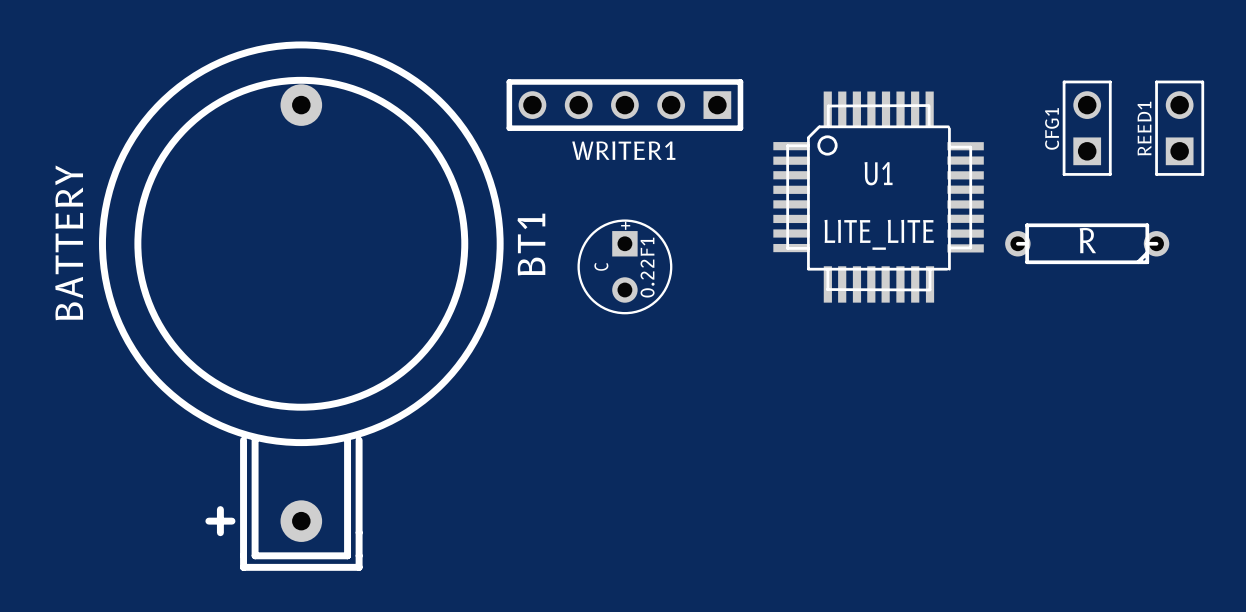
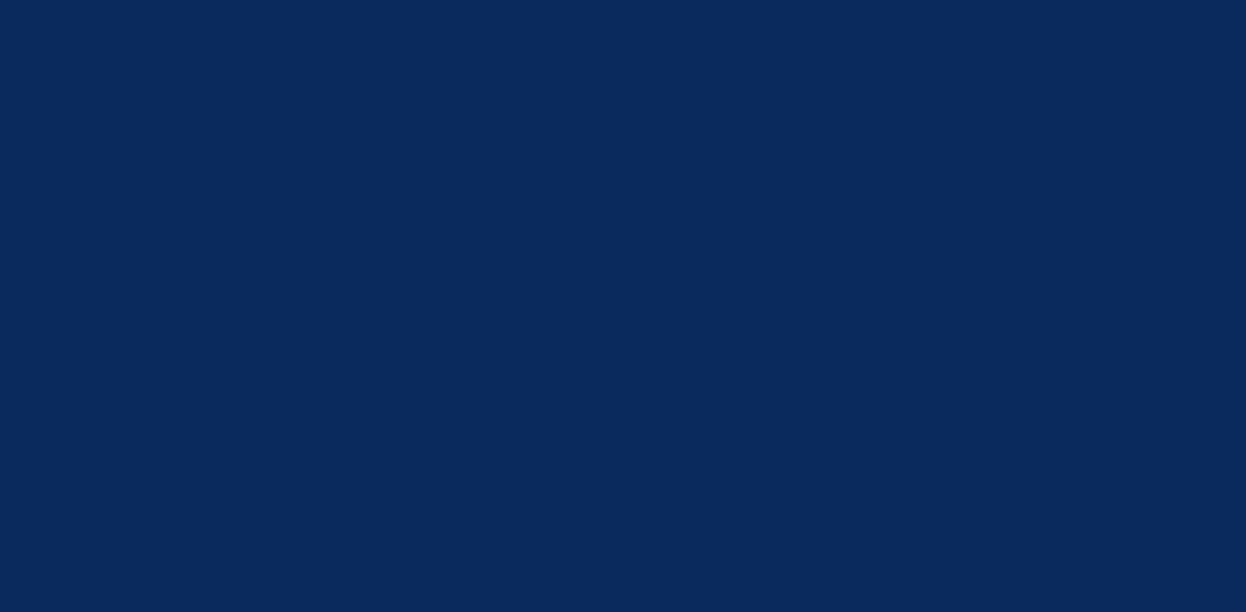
WRITER1: (624, 105) -> none
CFG1: (1087, 128) -> none
REED1: (1179, 128) -> none
U1: LITE_LITE (878, 197) -> none
part: R (1087, 243) -> none
0.22F1: C (624, 266) -> none
BT1: BATTERY (301, 306) -> none

